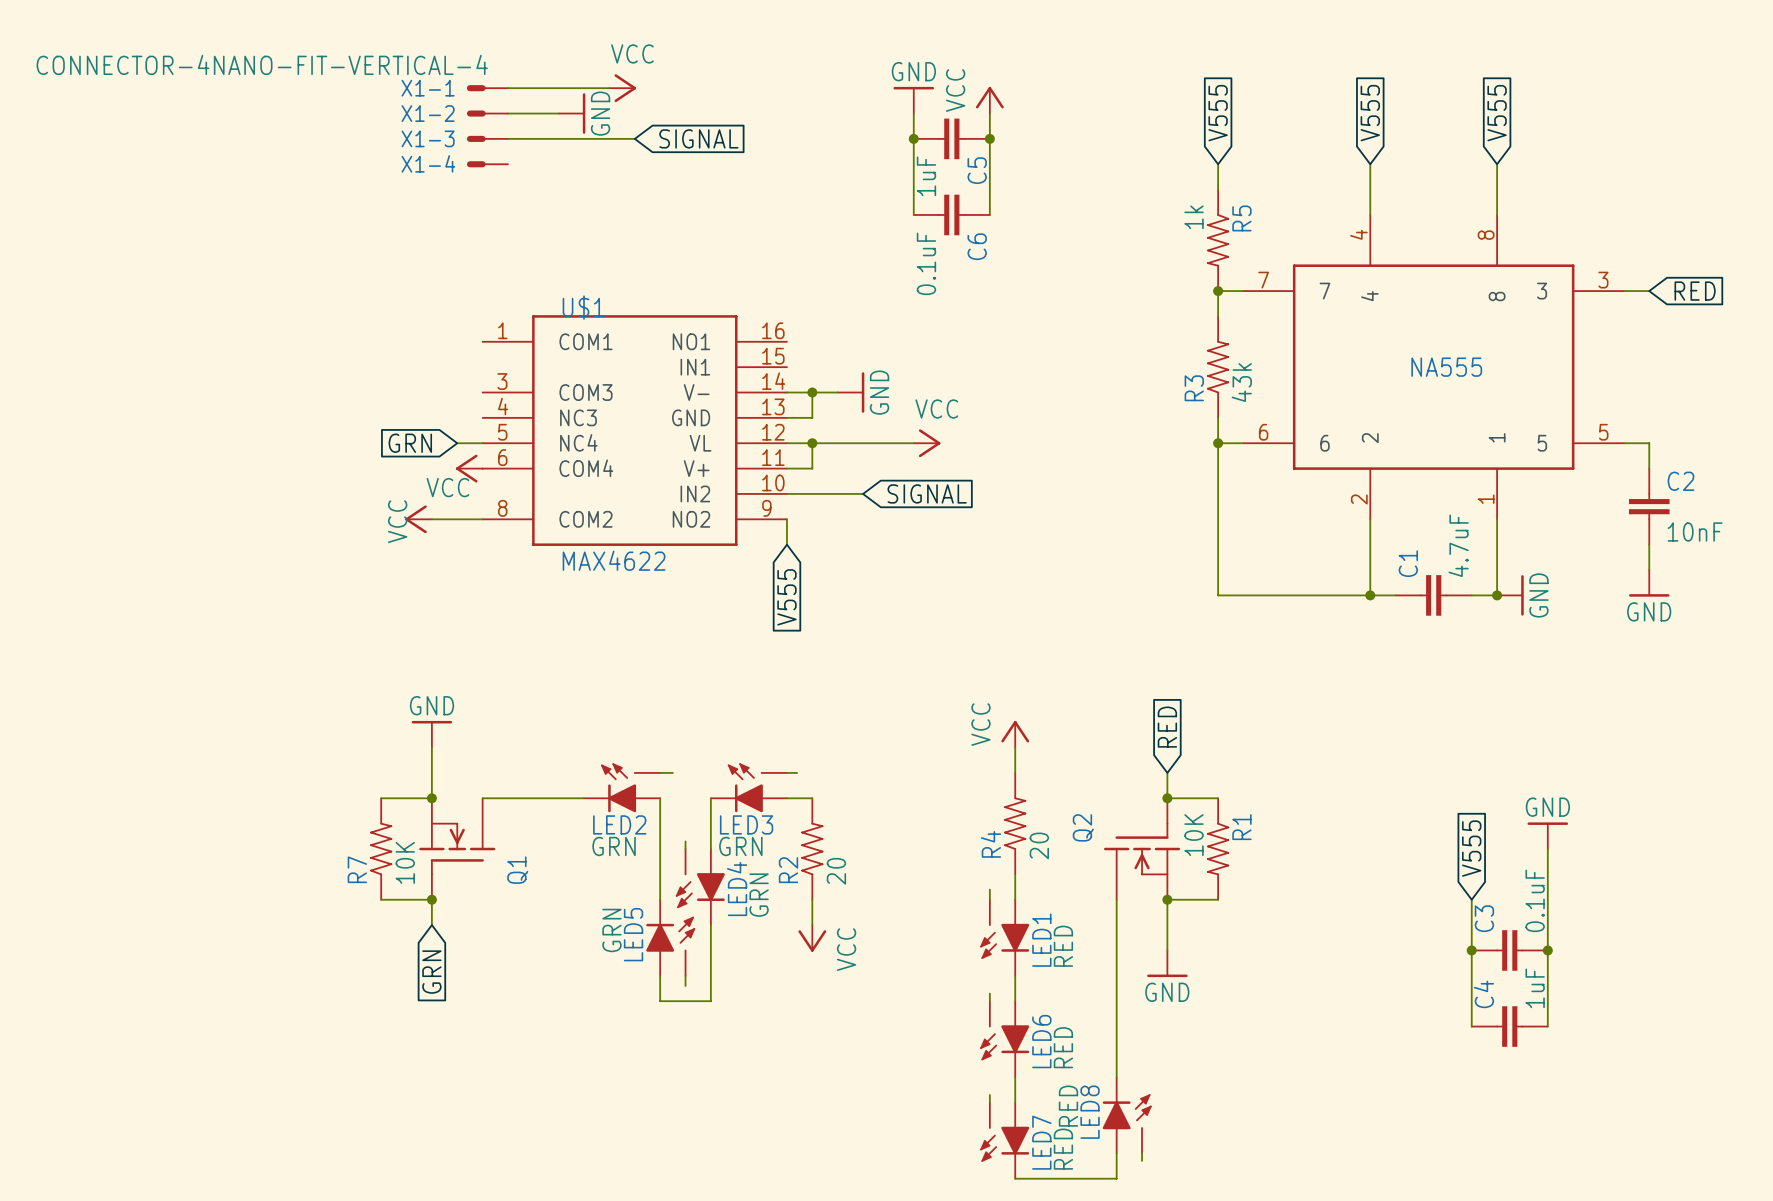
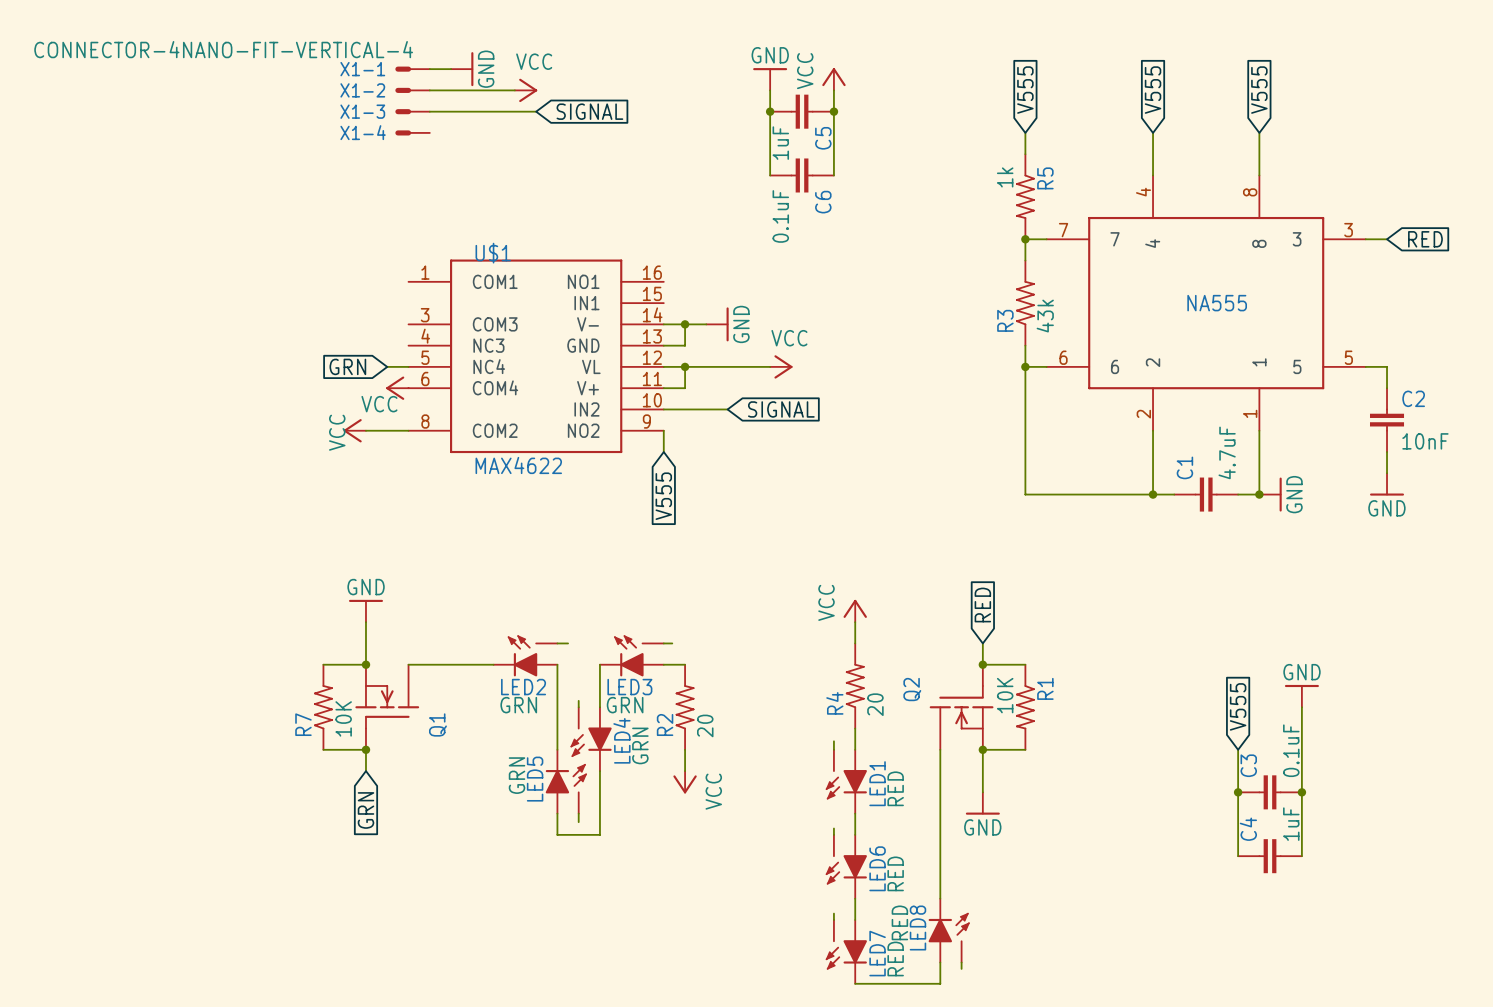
wire: (533, 88) (609, 88) -> none
power symbol position: VCC (622, 88) -> VCC (526, 90)
power symbol position: GND (572, 113) -> GND (462, 69)

